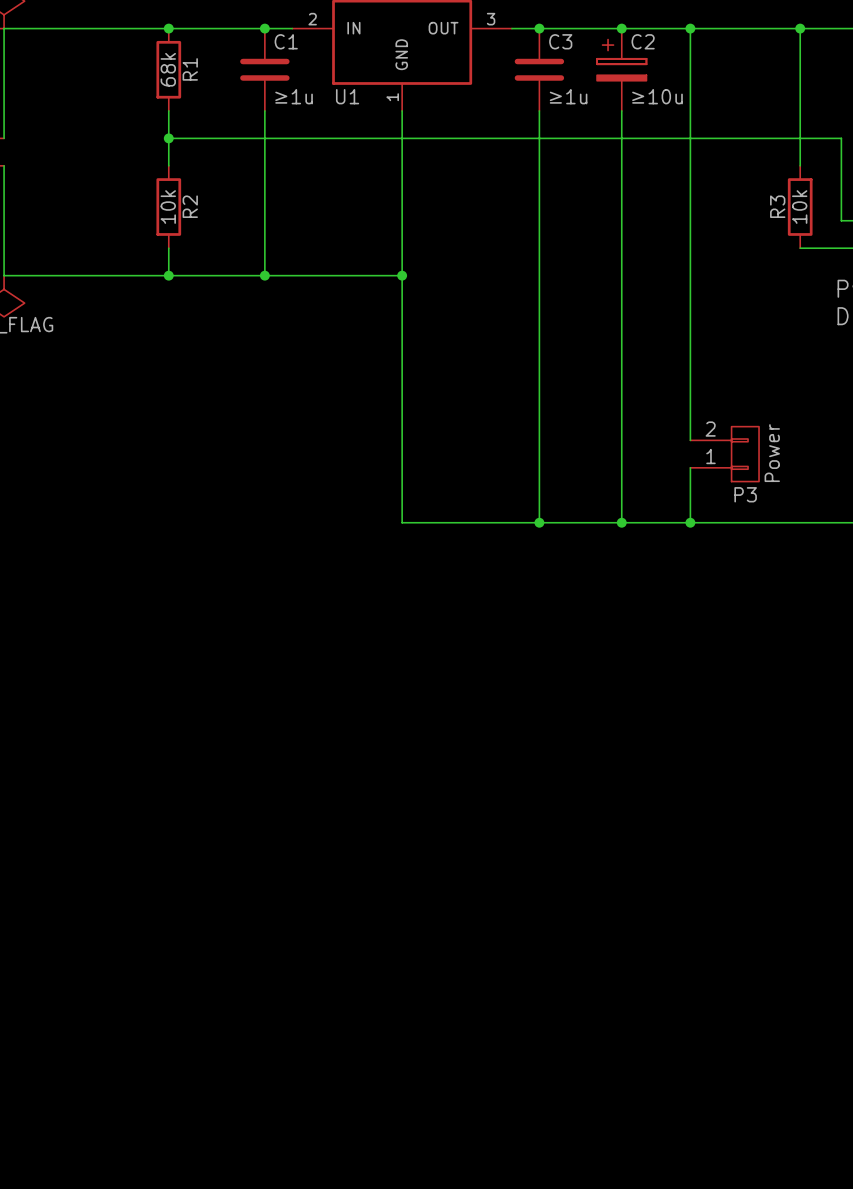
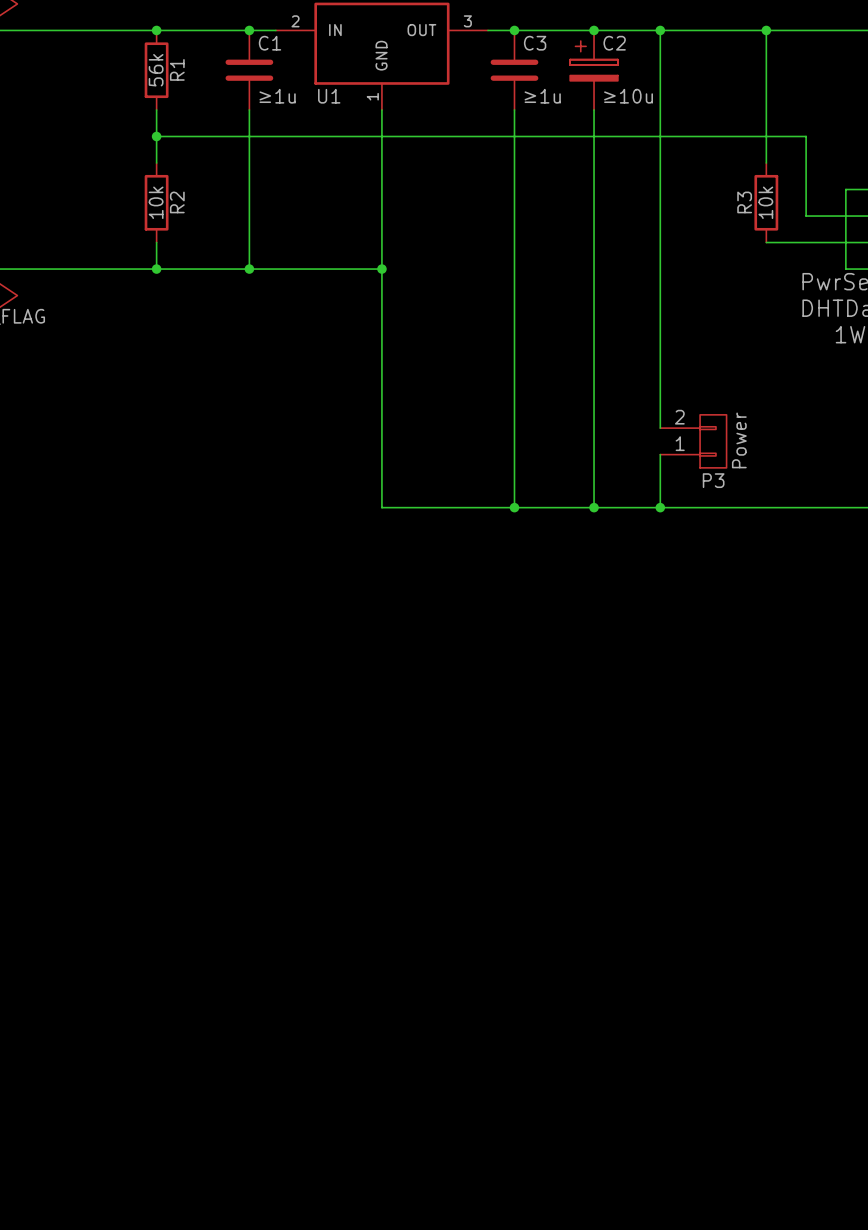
R1 value: 68k (168, 69) -> 56k (156, 70)

